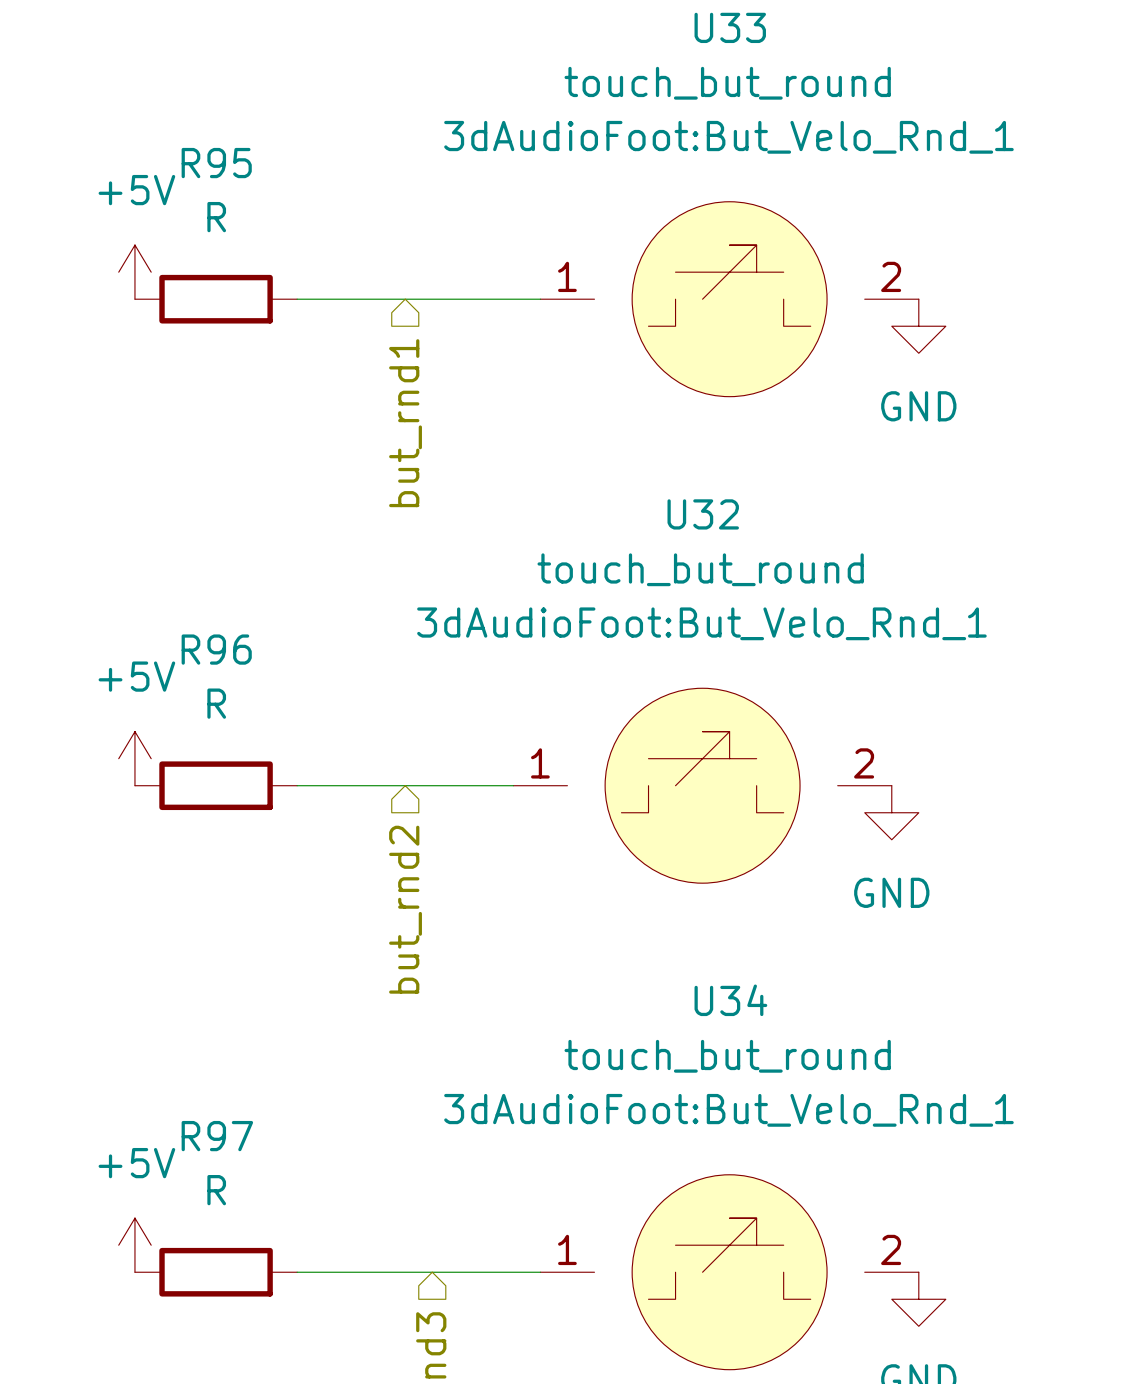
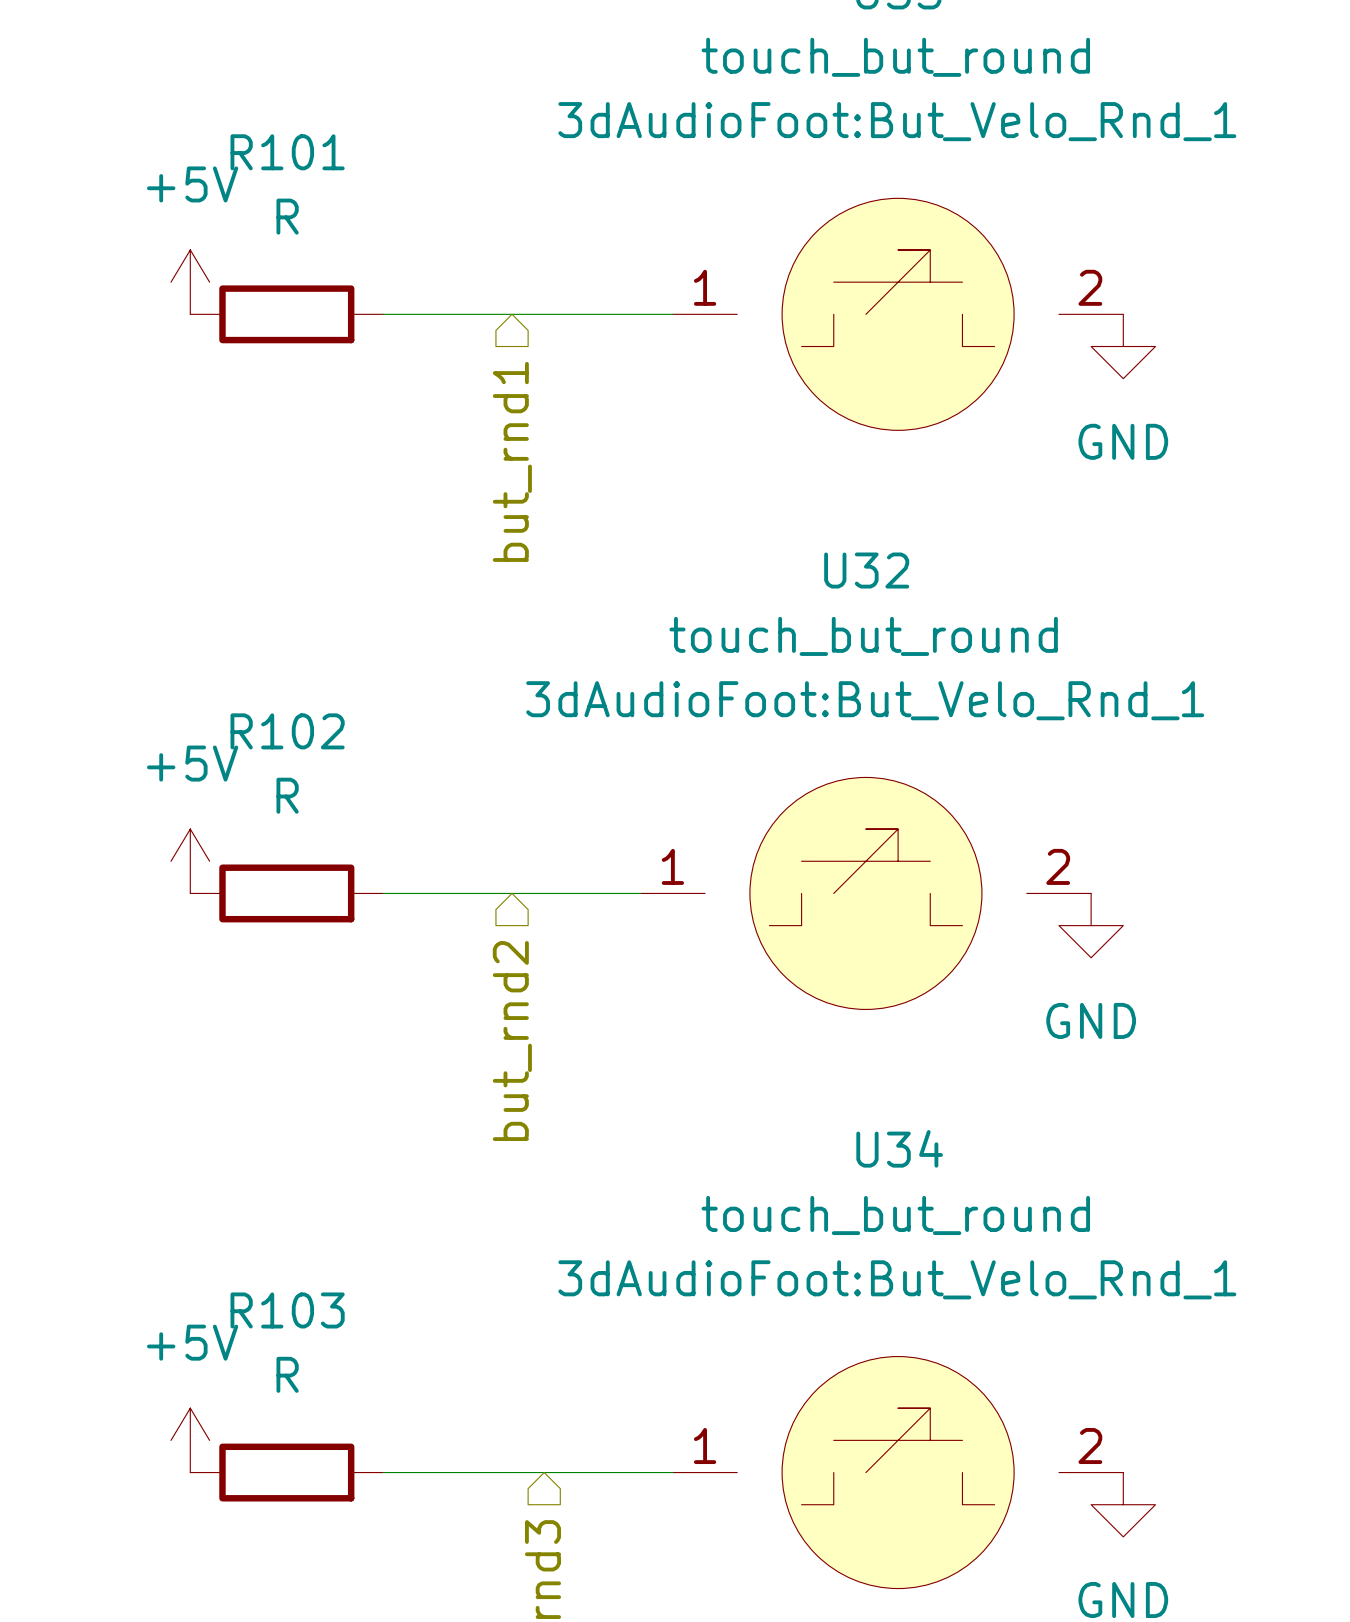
R95 name: R95 (216, 163) -> R101 (287, 152)
R96 name: R96 (216, 649) -> R102 (287, 731)
R97 name: R97 (217, 1136) -> R103 (287, 1310)

